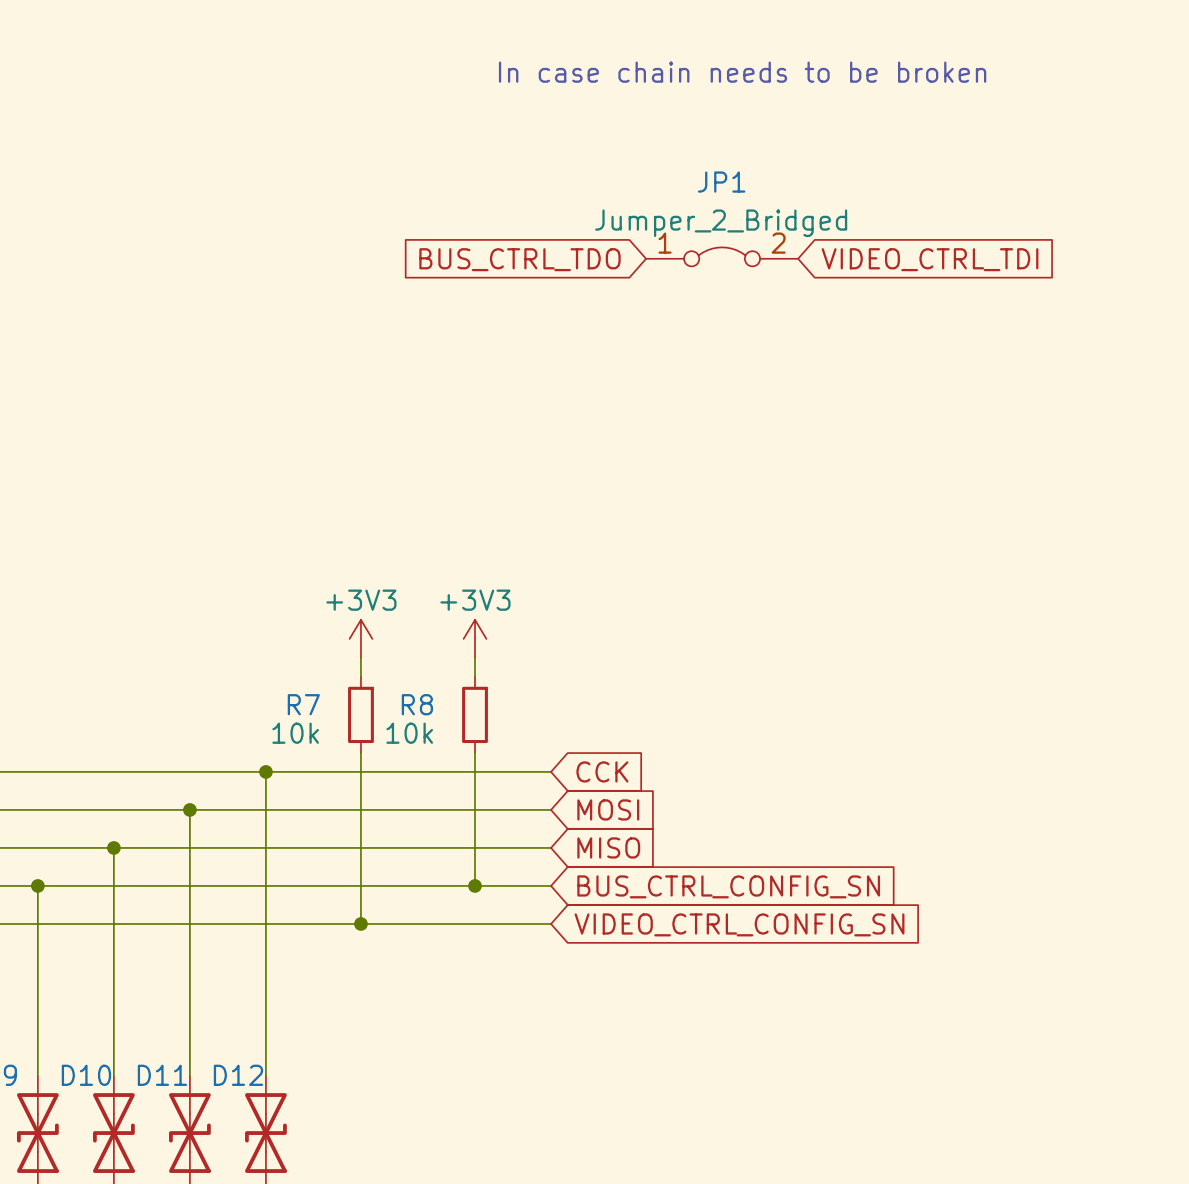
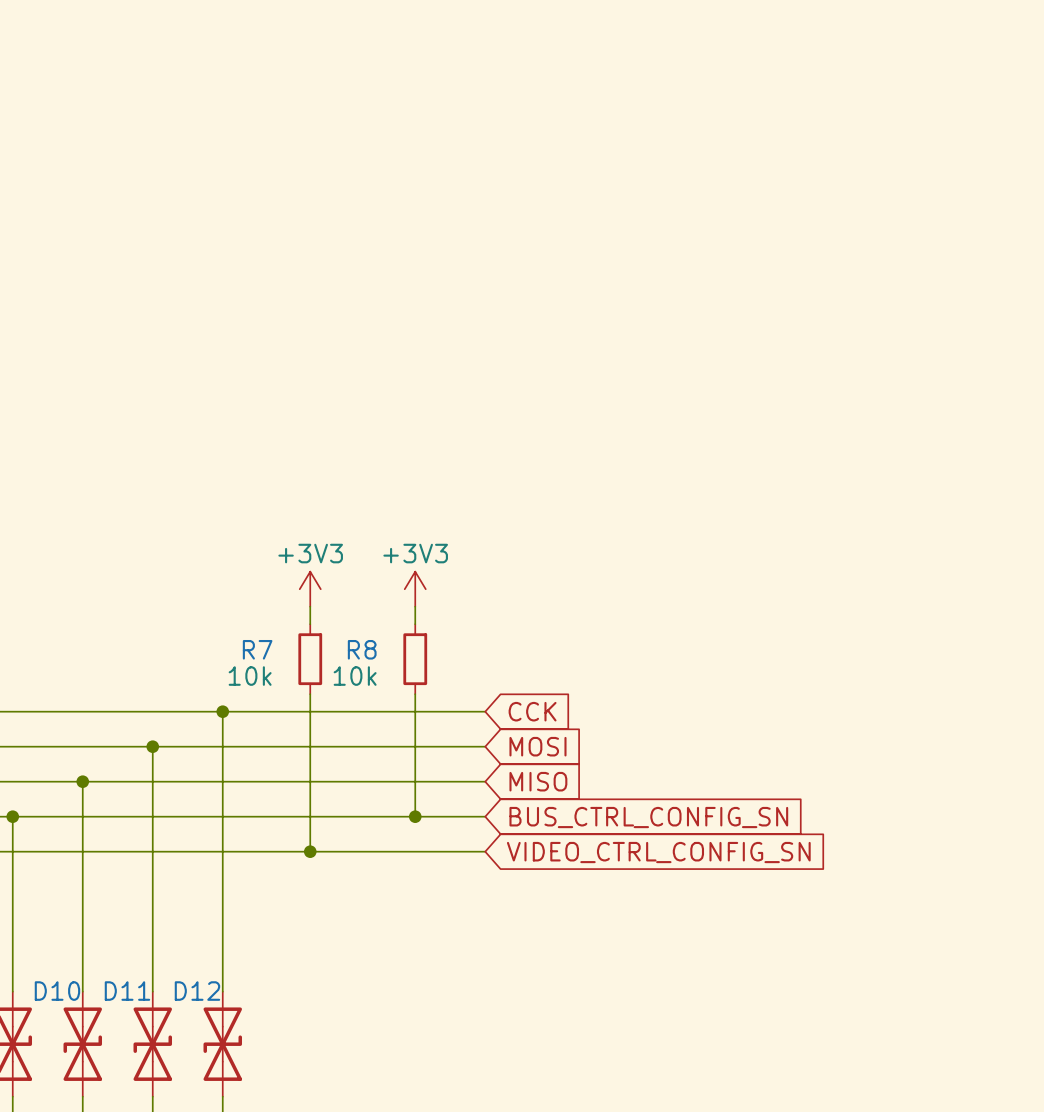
text: In case chain needs to be broken (742, 72) -> none
JP1: Jumper_2_Bridged (722, 256) -> none
global label: BUS_CTRL_TDO (519, 259) -> none
global label: VIDEO_CTRL_TDI (930, 259) -> none

